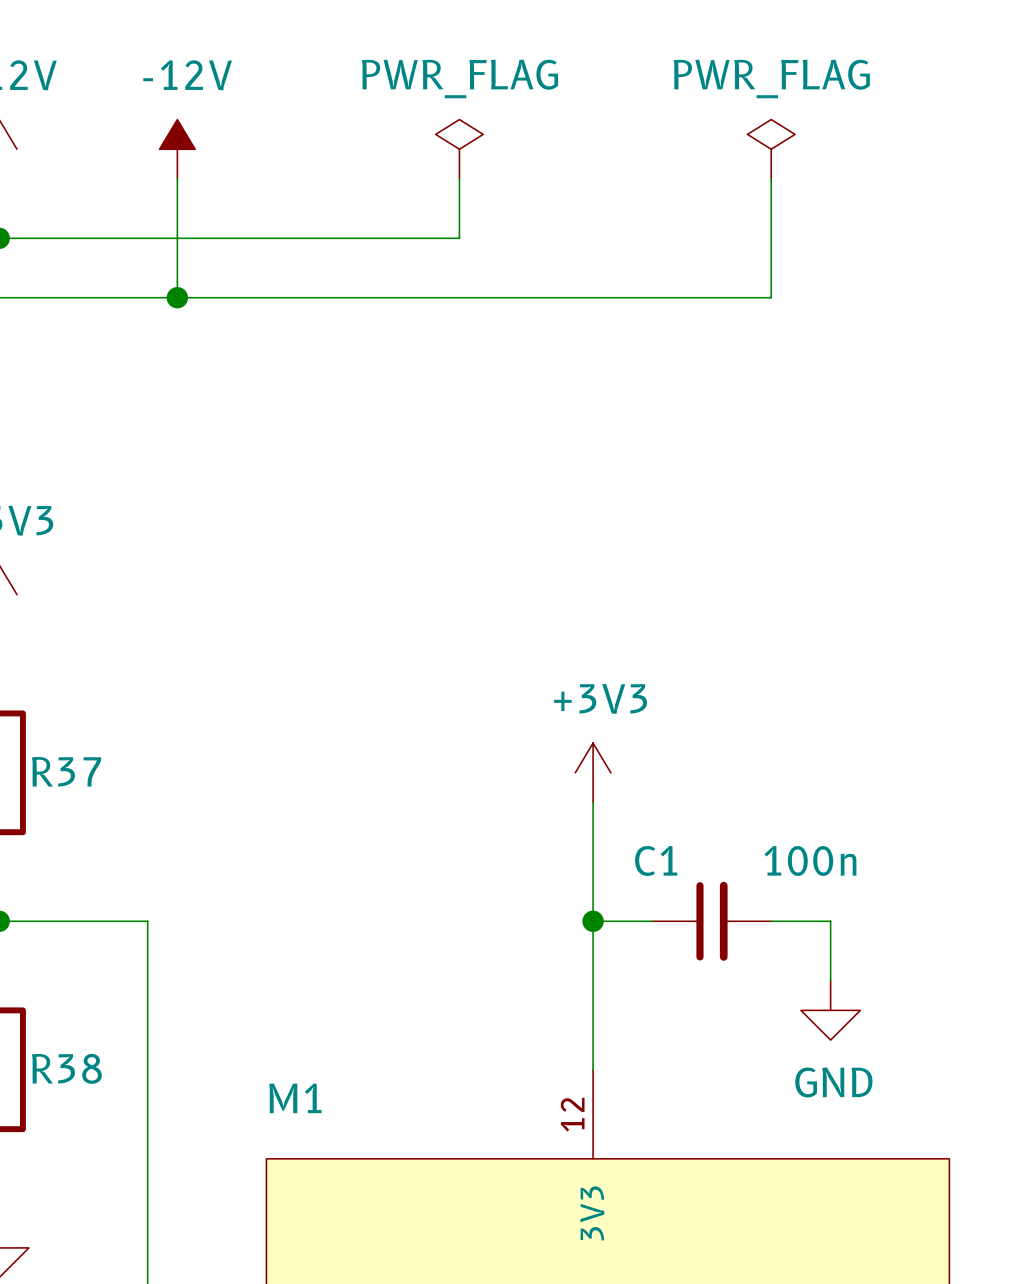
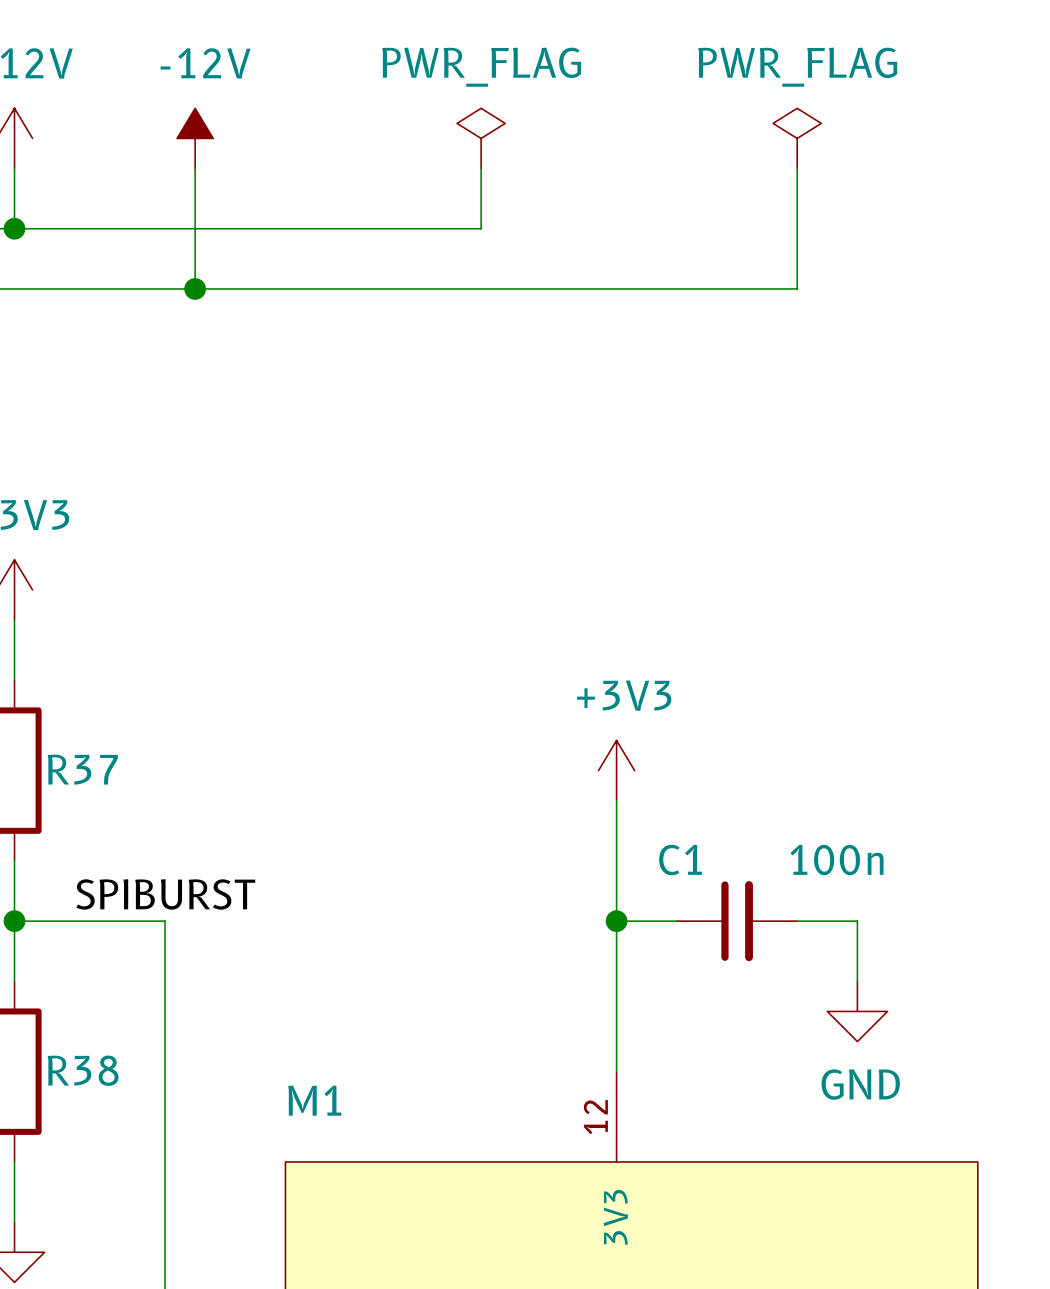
label: none -> SPIBURST (165, 894)

